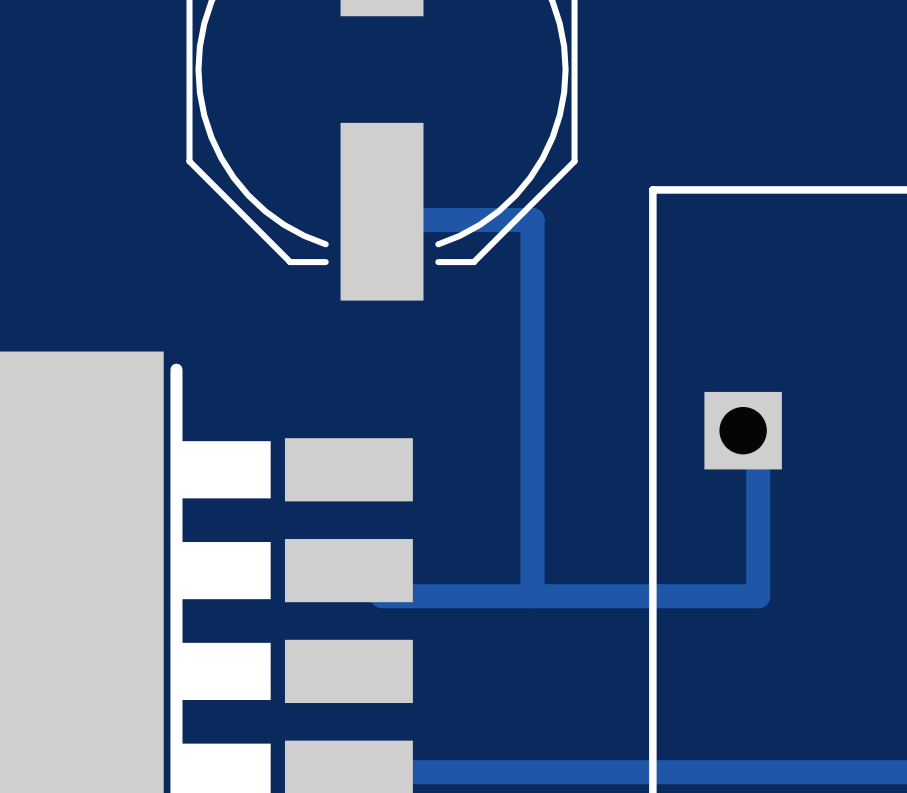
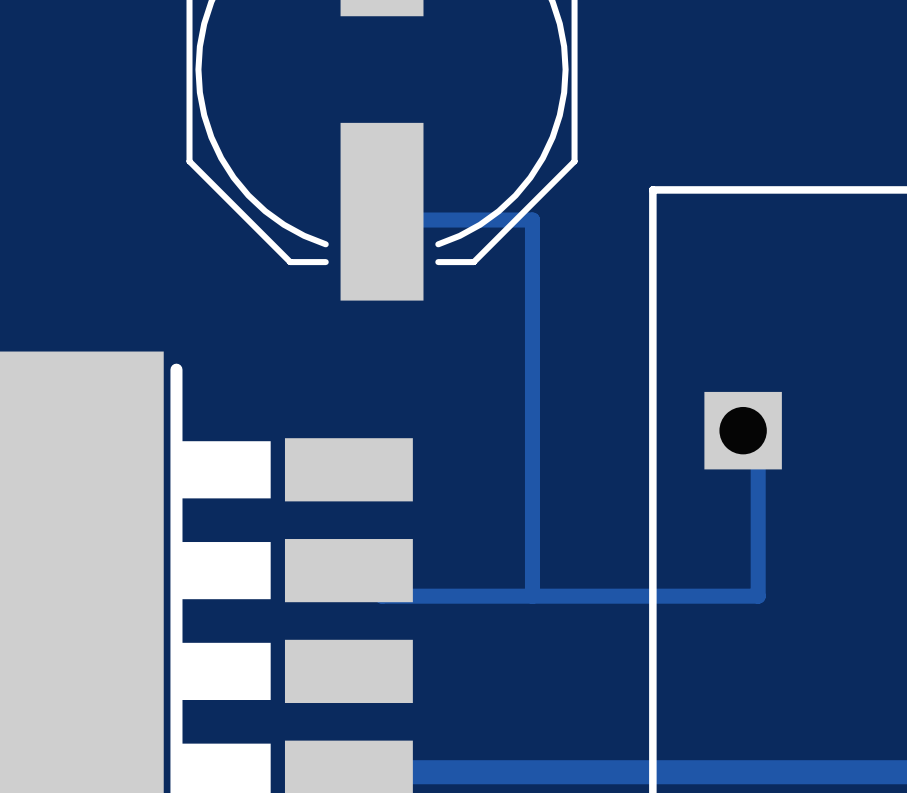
track width: thick (382, 220) (532, 220) (532, 596) -> thin (382, 220) (532, 220) (532, 596)
track width: thick (743, 430) (758, 445) (758, 596) (382, 596) -> thin (743, 430) (758, 445) (758, 596) (382, 596)

